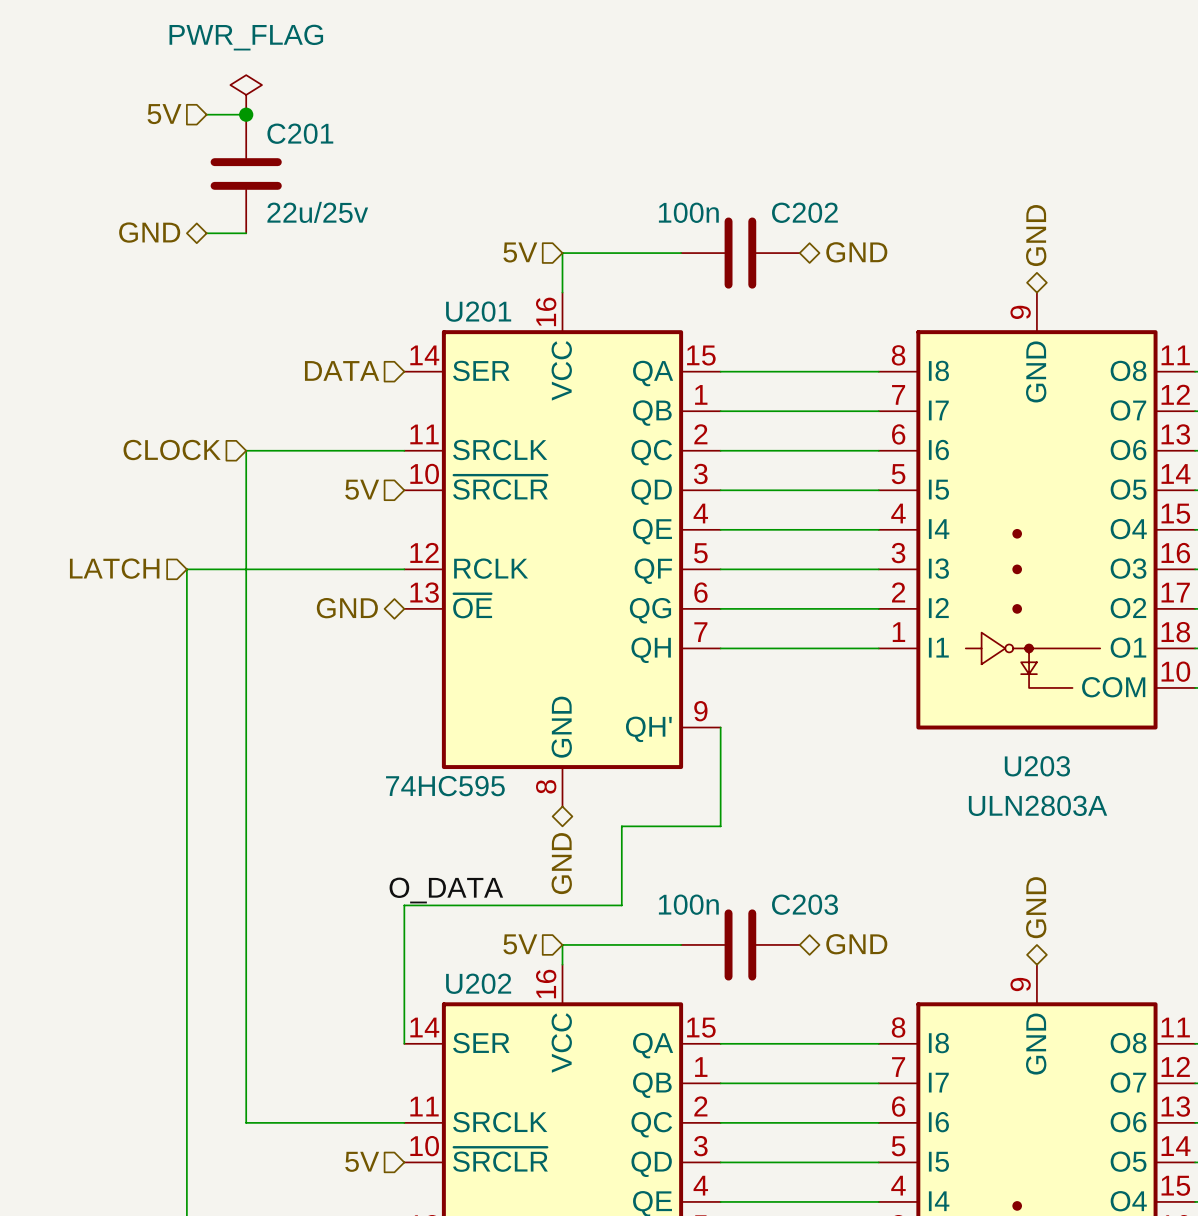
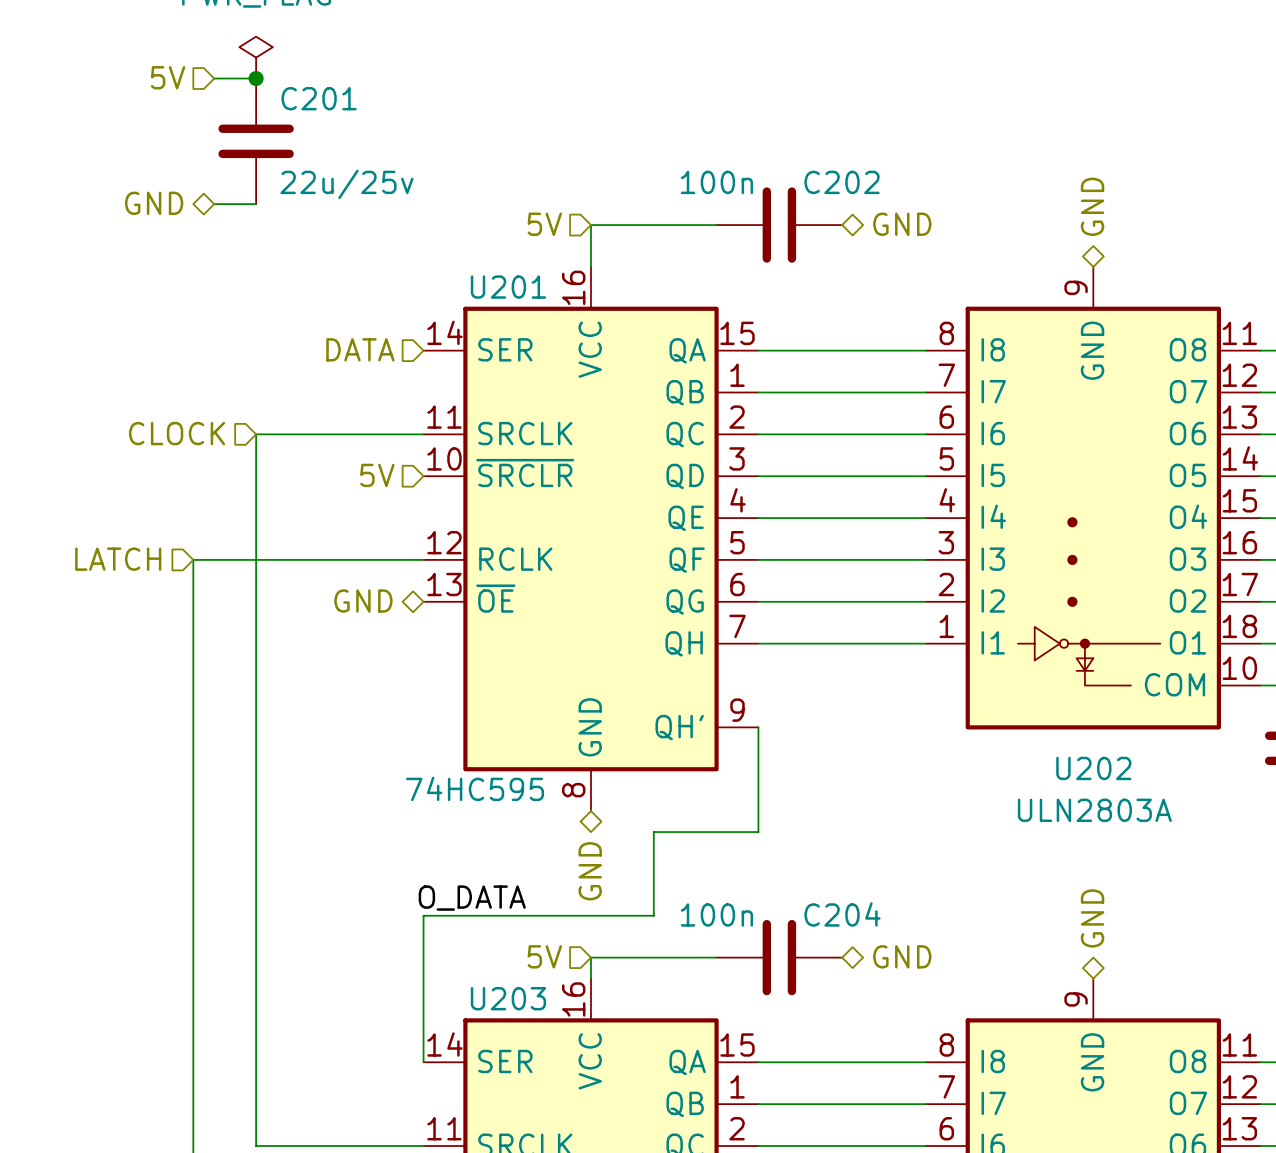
U203 name: U203 (1037, 766) -> U202 (1093, 768)
C203 name: C203 (805, 904) -> C204 (842, 914)
U202 name: U202 (478, 983) -> U203 (508, 998)

